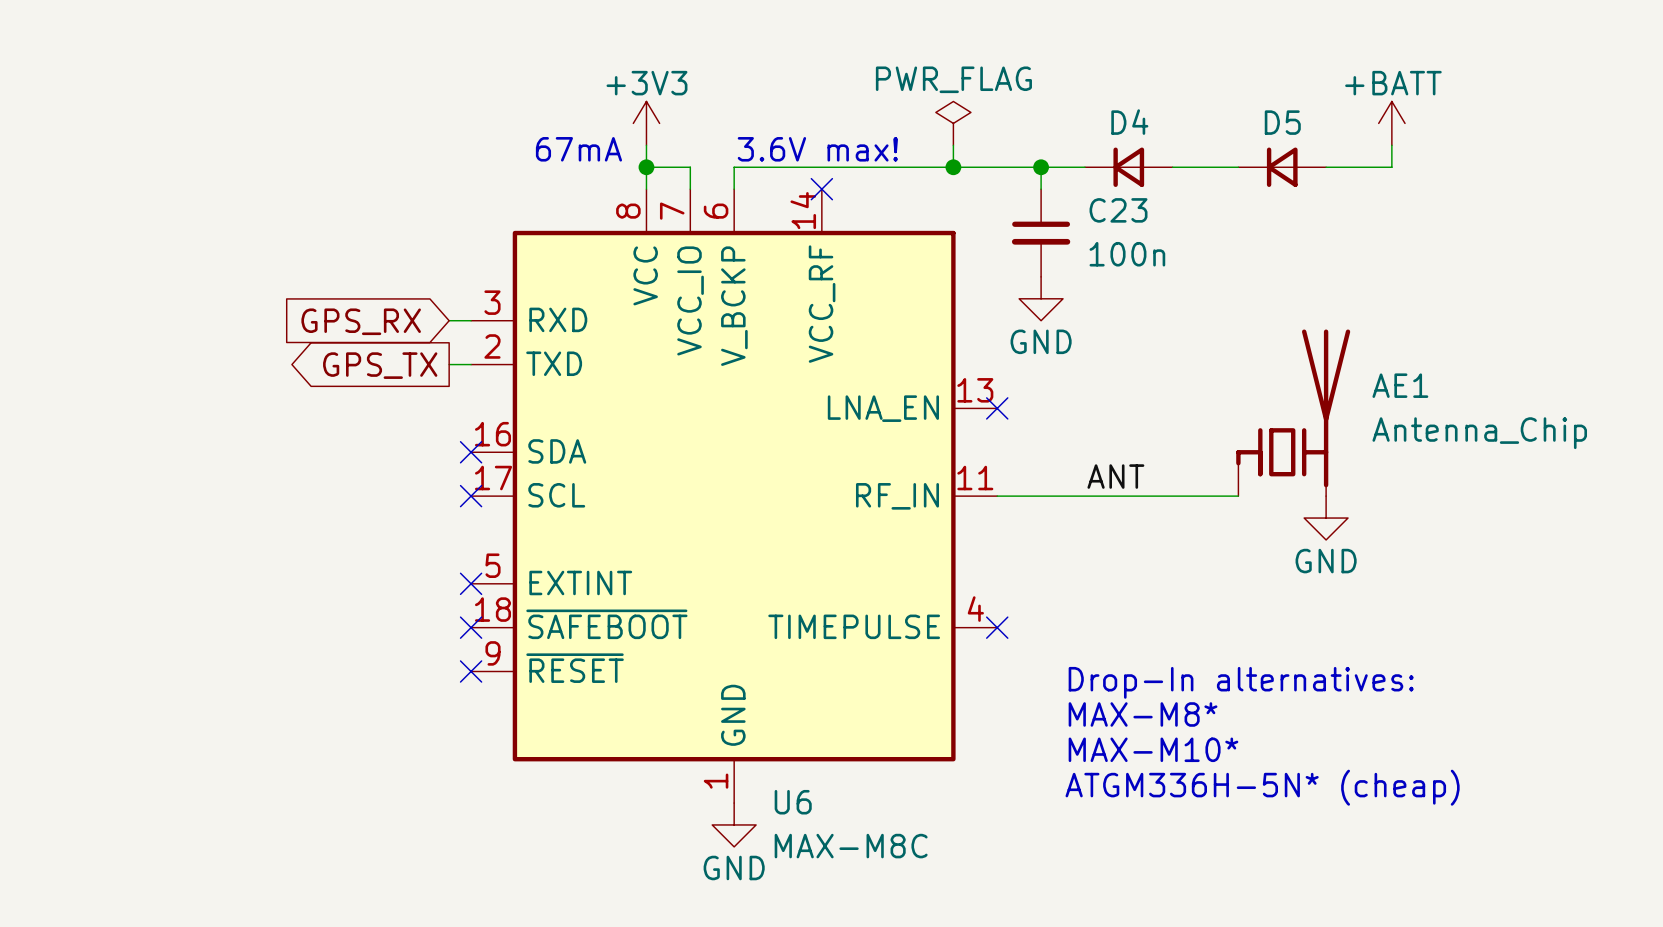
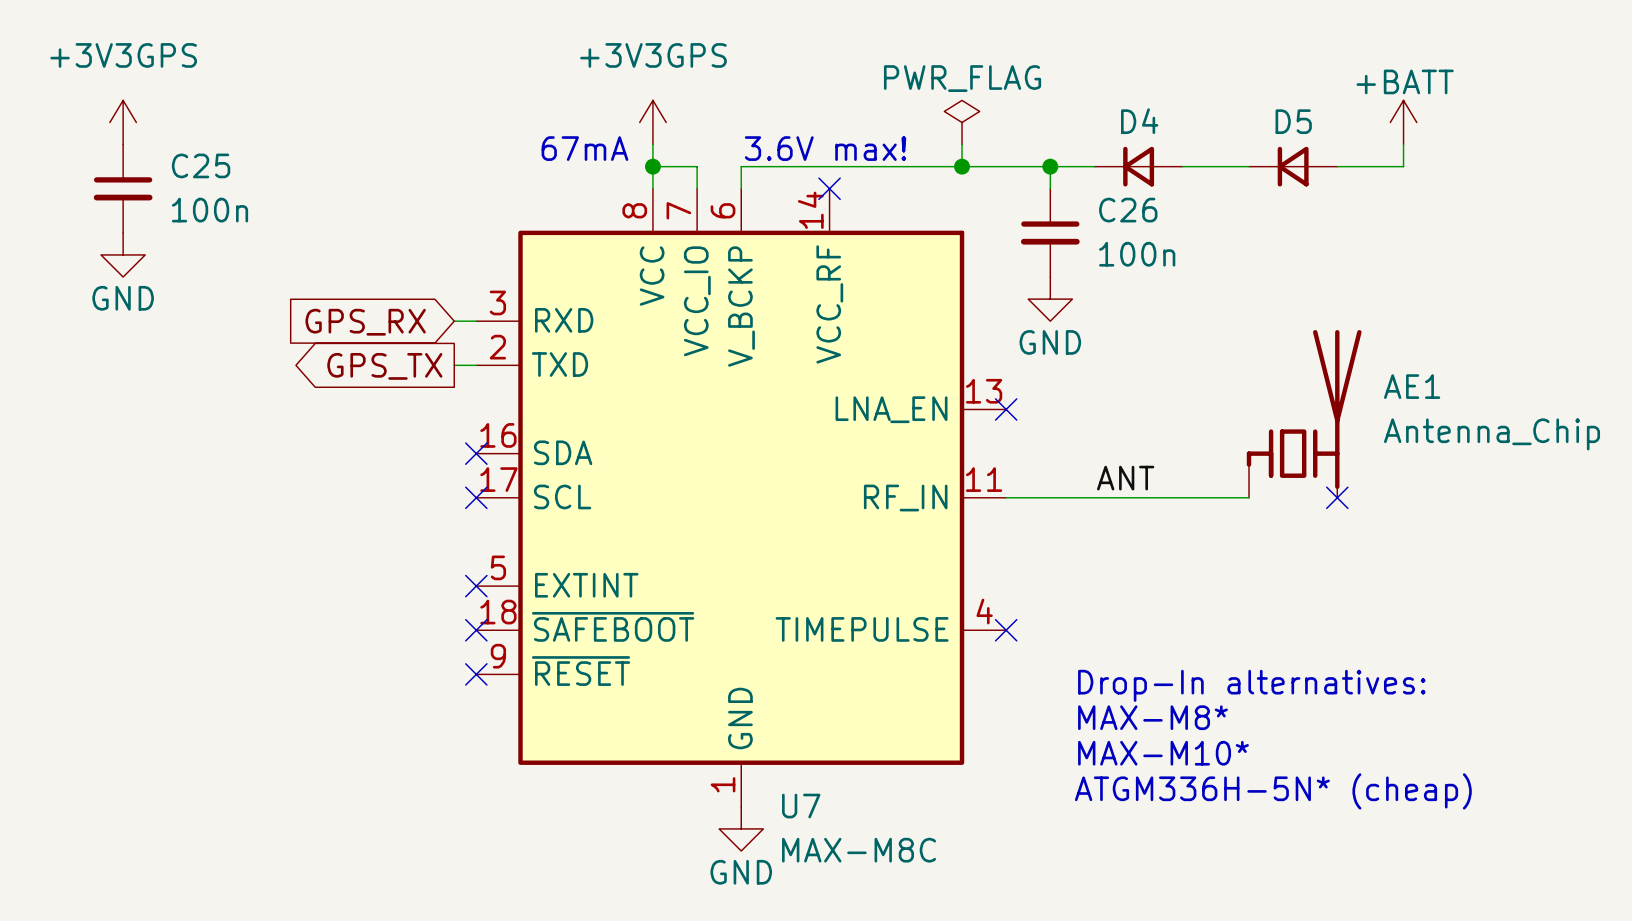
power symbol: none -> +3V3GPS (123, 122)
power symbol: +3V3 (646, 123) -> +3V3GPS (652, 122)
C25: none -> 100n (123, 188)
C23 name: C23 (1118, 210) -> C26 (1128, 210)
power symbol: none -> GND (123, 254)
no-connect mark: none -> (1337, 497)
power symbol: GND (1326, 518) -> none
U6 name: U6 (793, 802) -> U7 (801, 806)

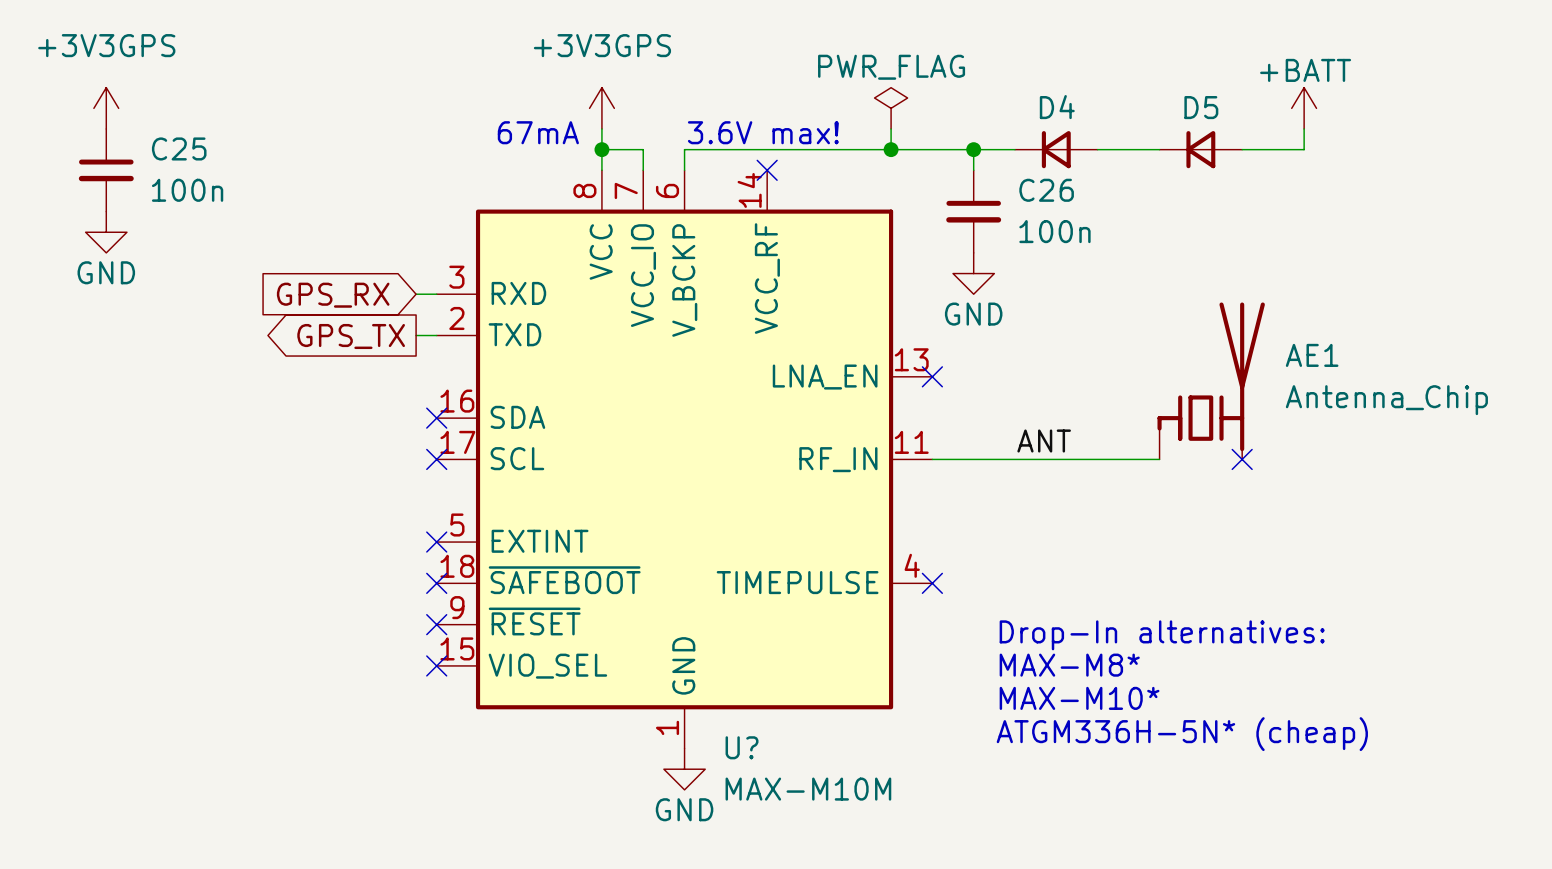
U7: MAX-M8C (741, 497) -> none
U?: none -> MAX-M10M (684, 459)
no-connect mark: none -> (436, 665)

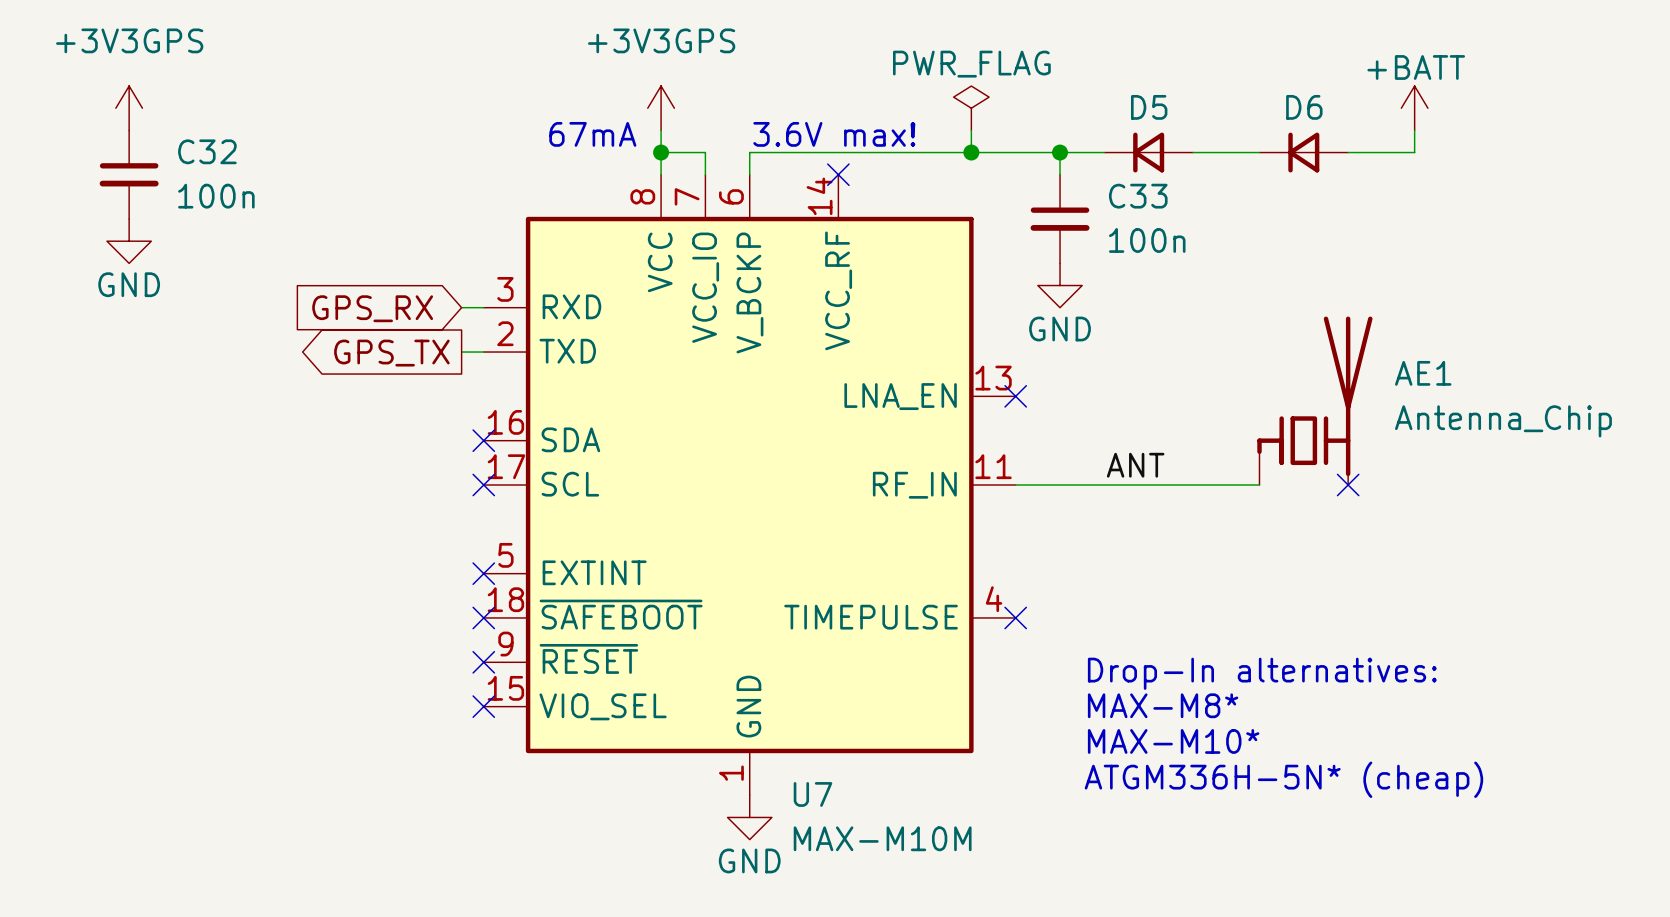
D4 name: D4 (1057, 107) -> D5 (1149, 107)
D5 name: D5 (1201, 107) -> D6 (1304, 107)
C25 name: C25 (179, 148) -> C32 (207, 151)
C26 name: C26 (1046, 190) -> C33 (1138, 196)
U? name: U? (742, 747) -> U7 (812, 794)

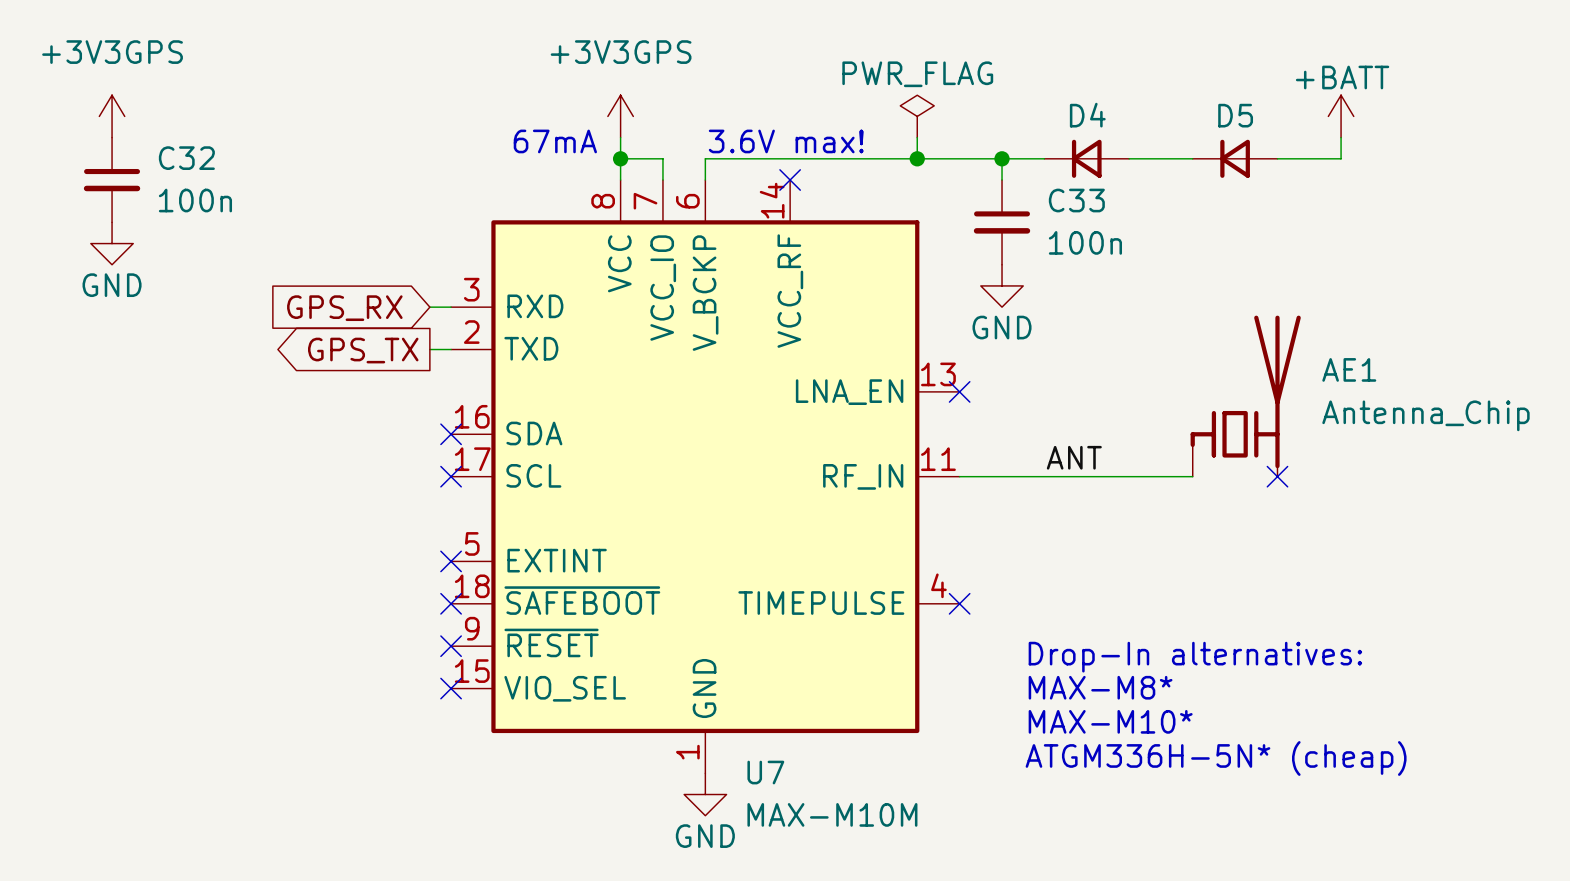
D5 name: D5 (1149, 107) -> D4 (1087, 115)
D6 name: D6 (1304, 107) -> D5 (1235, 115)

